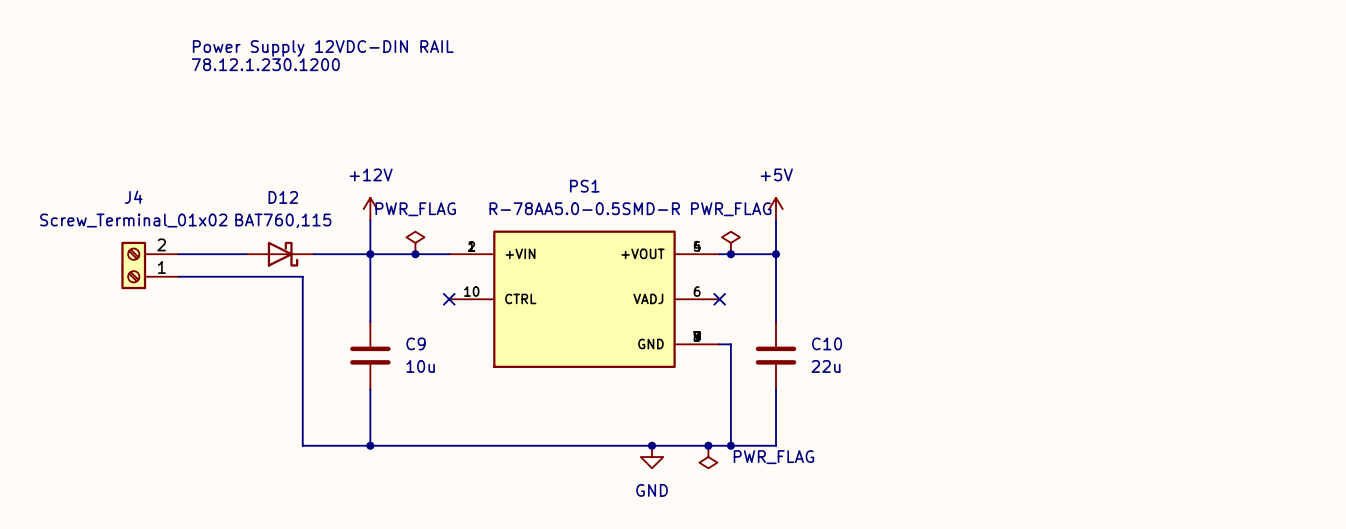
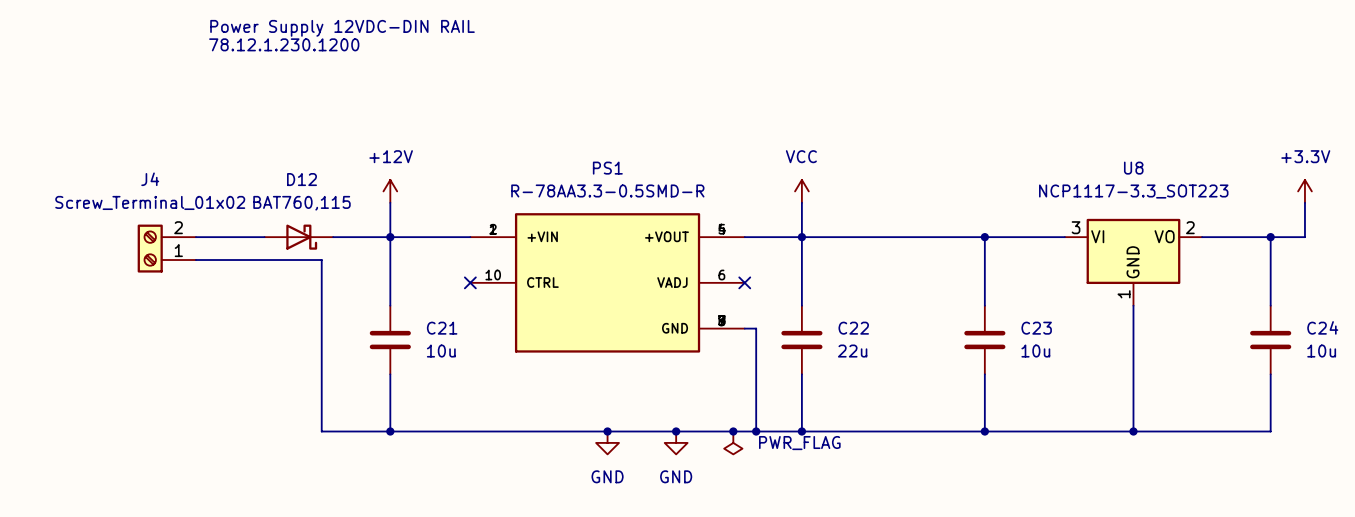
PS1 value: R-78AA5.0-0.5SMD-R (584, 208) -> R-78AA3.3-0.5SMD-R (607, 190)
power symbol: +5V (776, 209) -> VCC (801, 191)
power symbol: none -> +3.3V (1304, 191)
wire: none -> (1304, 202) (1304, 237) (1202, 237)
power symbol: PWR_FLAG (415, 242) -> none
power symbol: PWR_FLAG (730, 242) -> none
junction: (415, 254) -> none
junction: (730, 254) -> none
wire: none -> (801, 237) (1064, 237)
wire: none -> (984, 237) (984, 305)
junction: none -> (984, 237)
wire: none -> (1270, 237) (1270, 305)
junction: none -> (1270, 237)
U8: none -> NCP1117-3.3_SOT223 (1133, 262)
wire: none -> (1133, 305) (1133, 431)
C9 name: C9 (416, 343) -> C21 (442, 328)
C10 name: C10 (827, 343) -> C22 (853, 328)
C23: none -> 10u (984, 340)
C24: none -> 10u (1270, 340)
wire: none -> (984, 374) (984, 431)
wire: none -> (1270, 374) (1270, 431) (801, 431)
junction: none -> (607, 431)
junction: none -> (801, 431)
junction: none -> (984, 431)
junction: none -> (1133, 431)
power symbol: none -> GND (607, 442)

